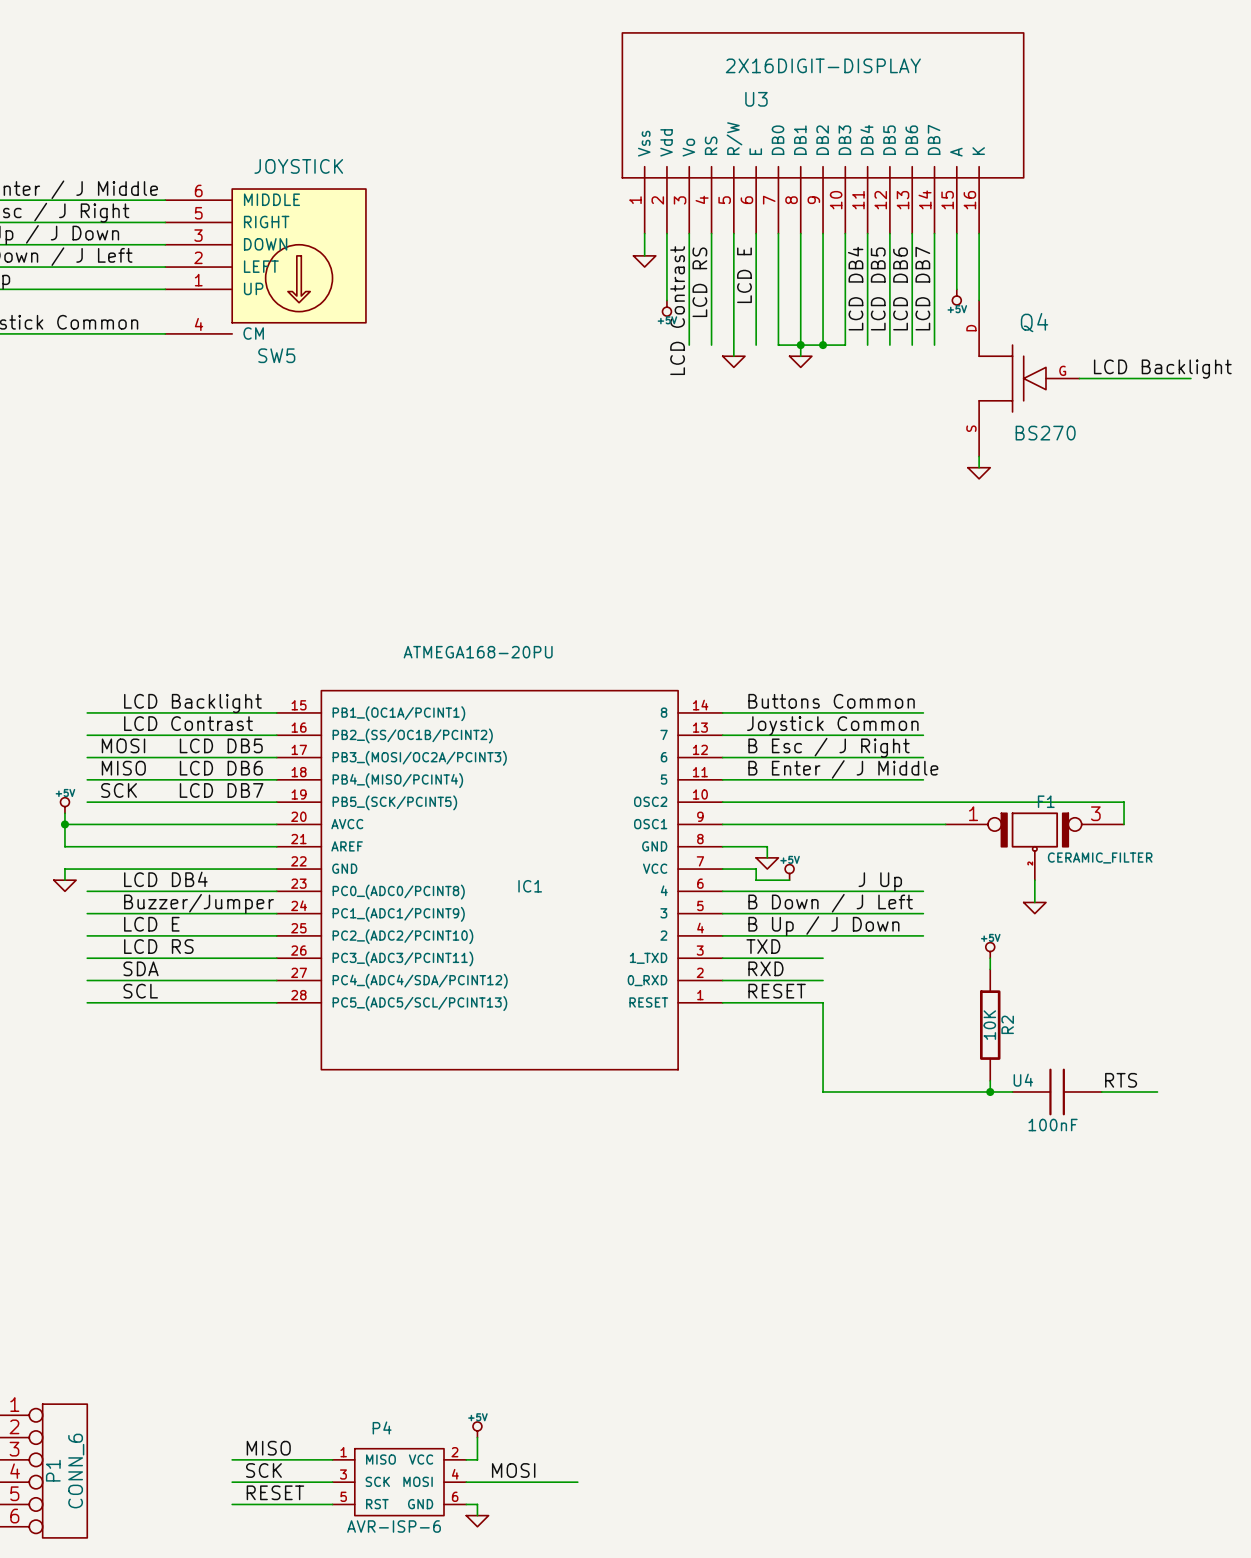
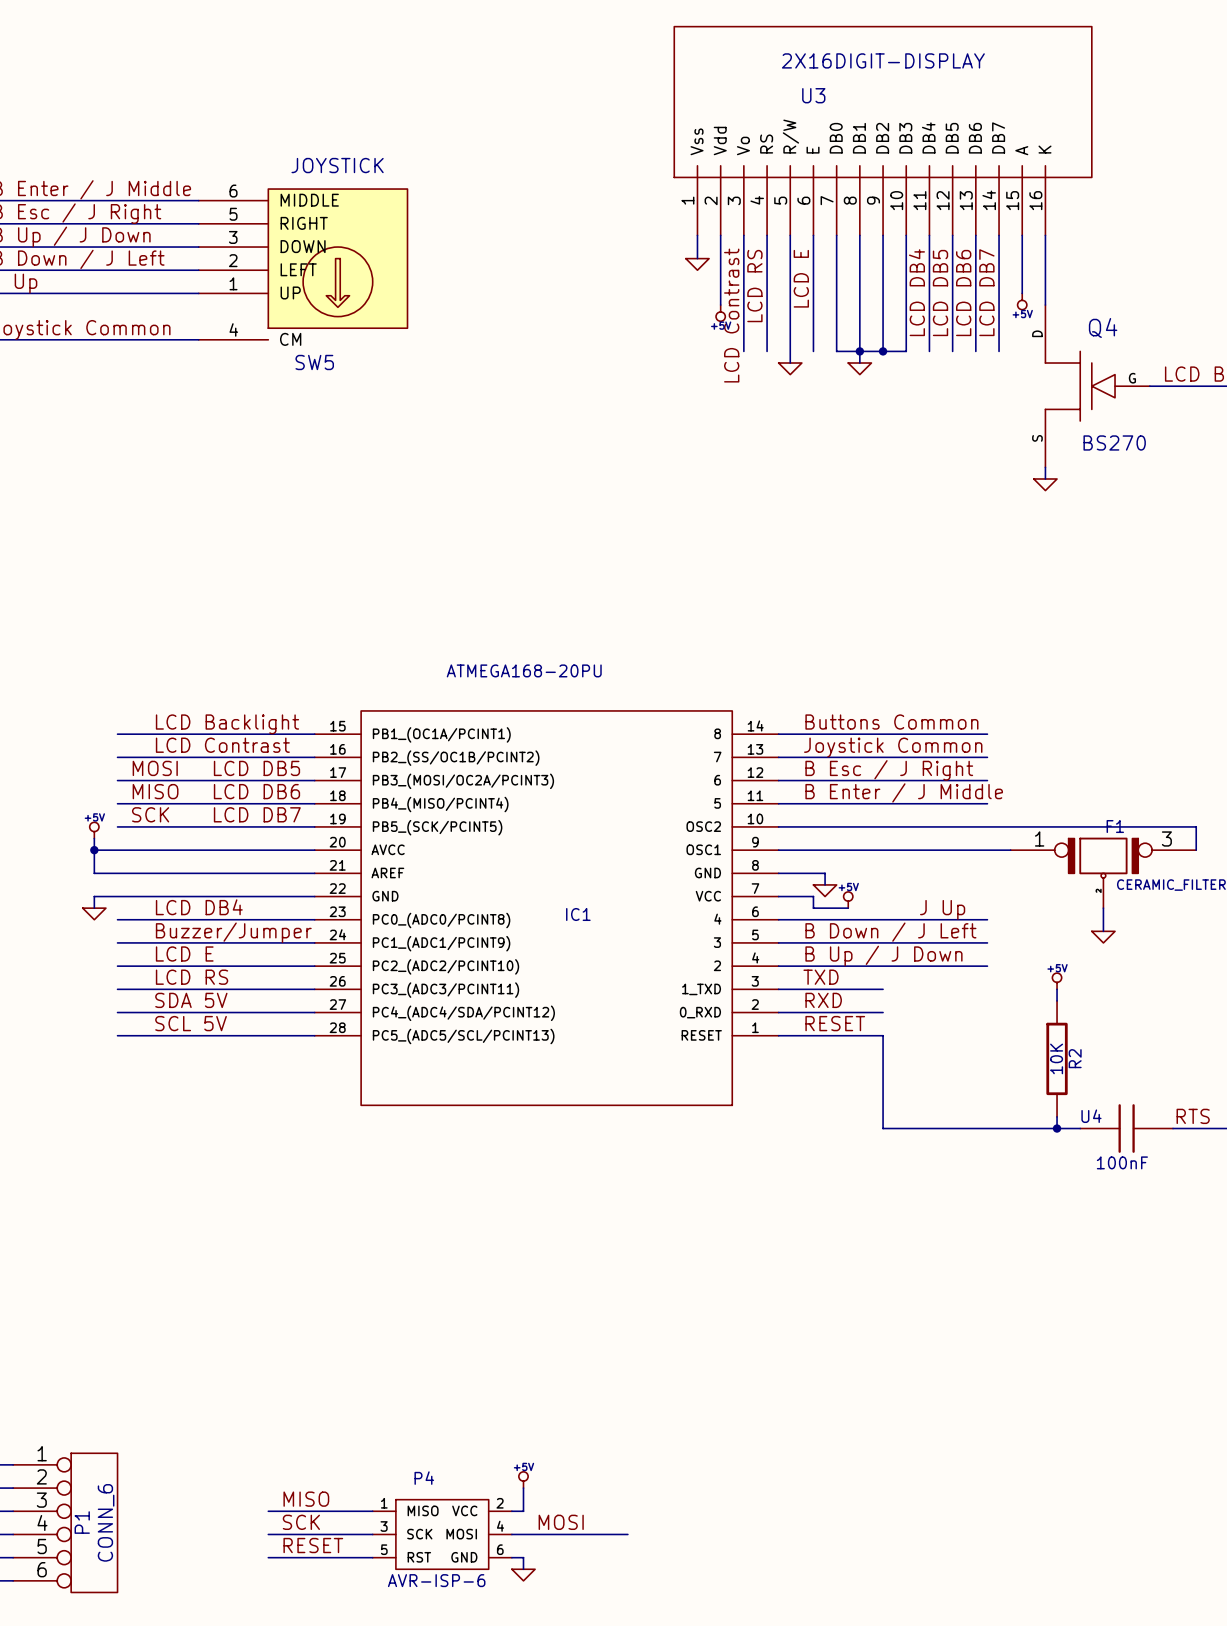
label: SDA (141, 968) -> SDA 5V (191, 1000)
label: SCL (140, 991) -> SCL 5V (191, 1023)

